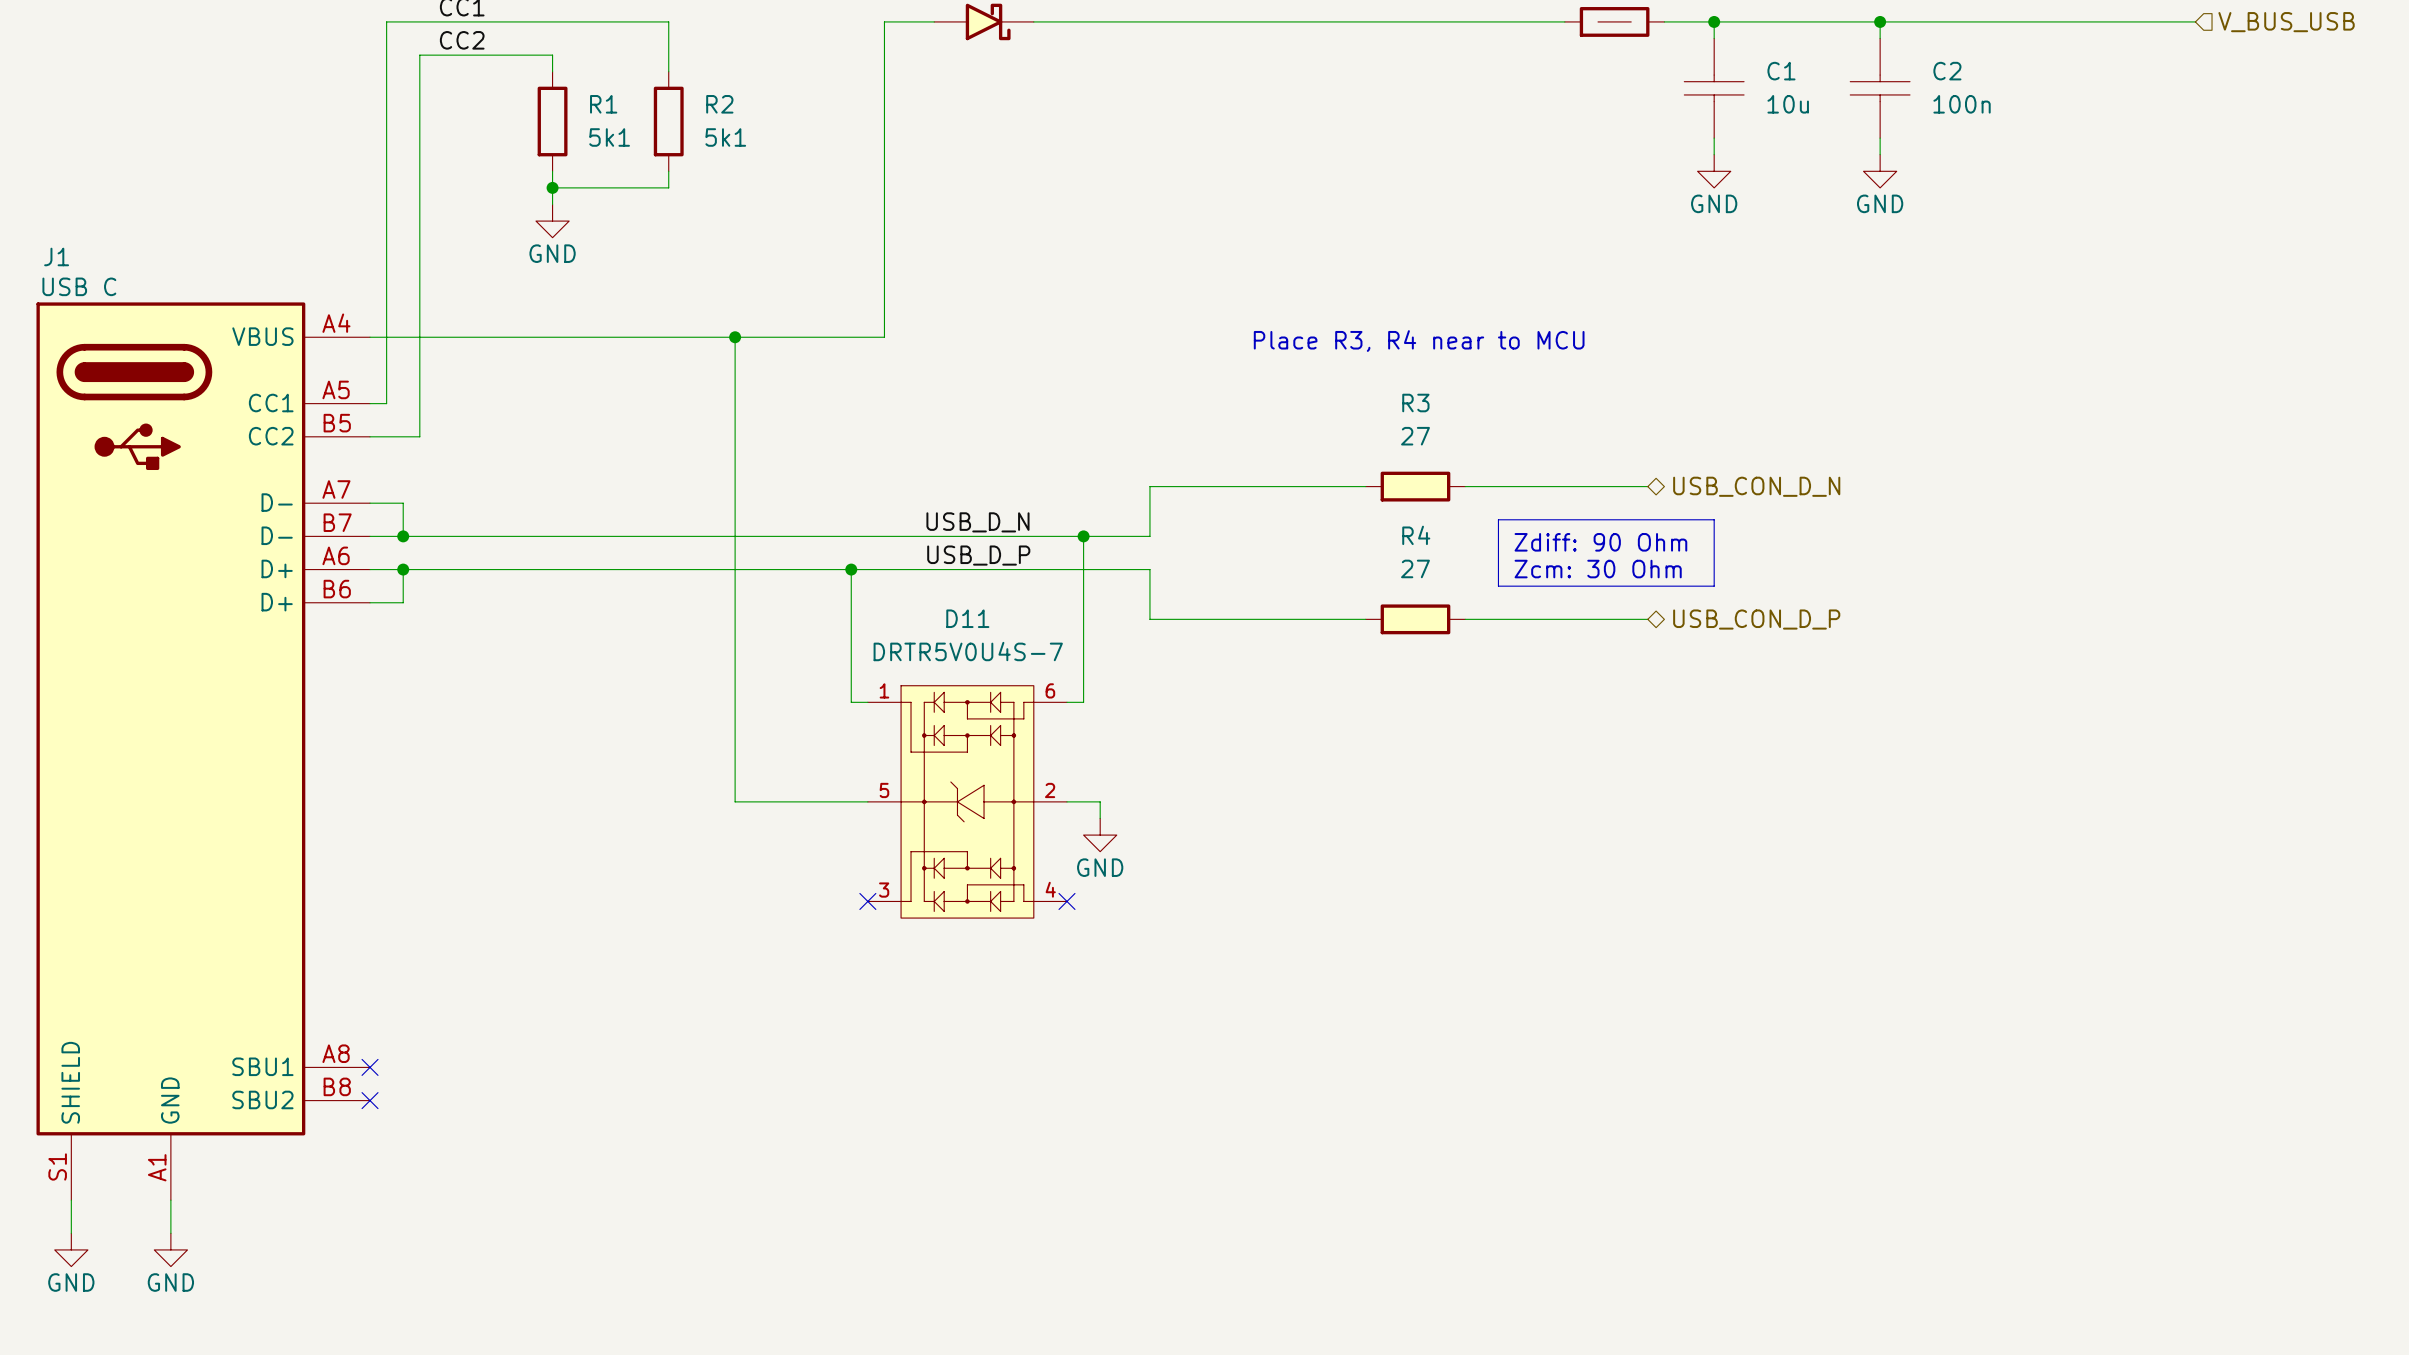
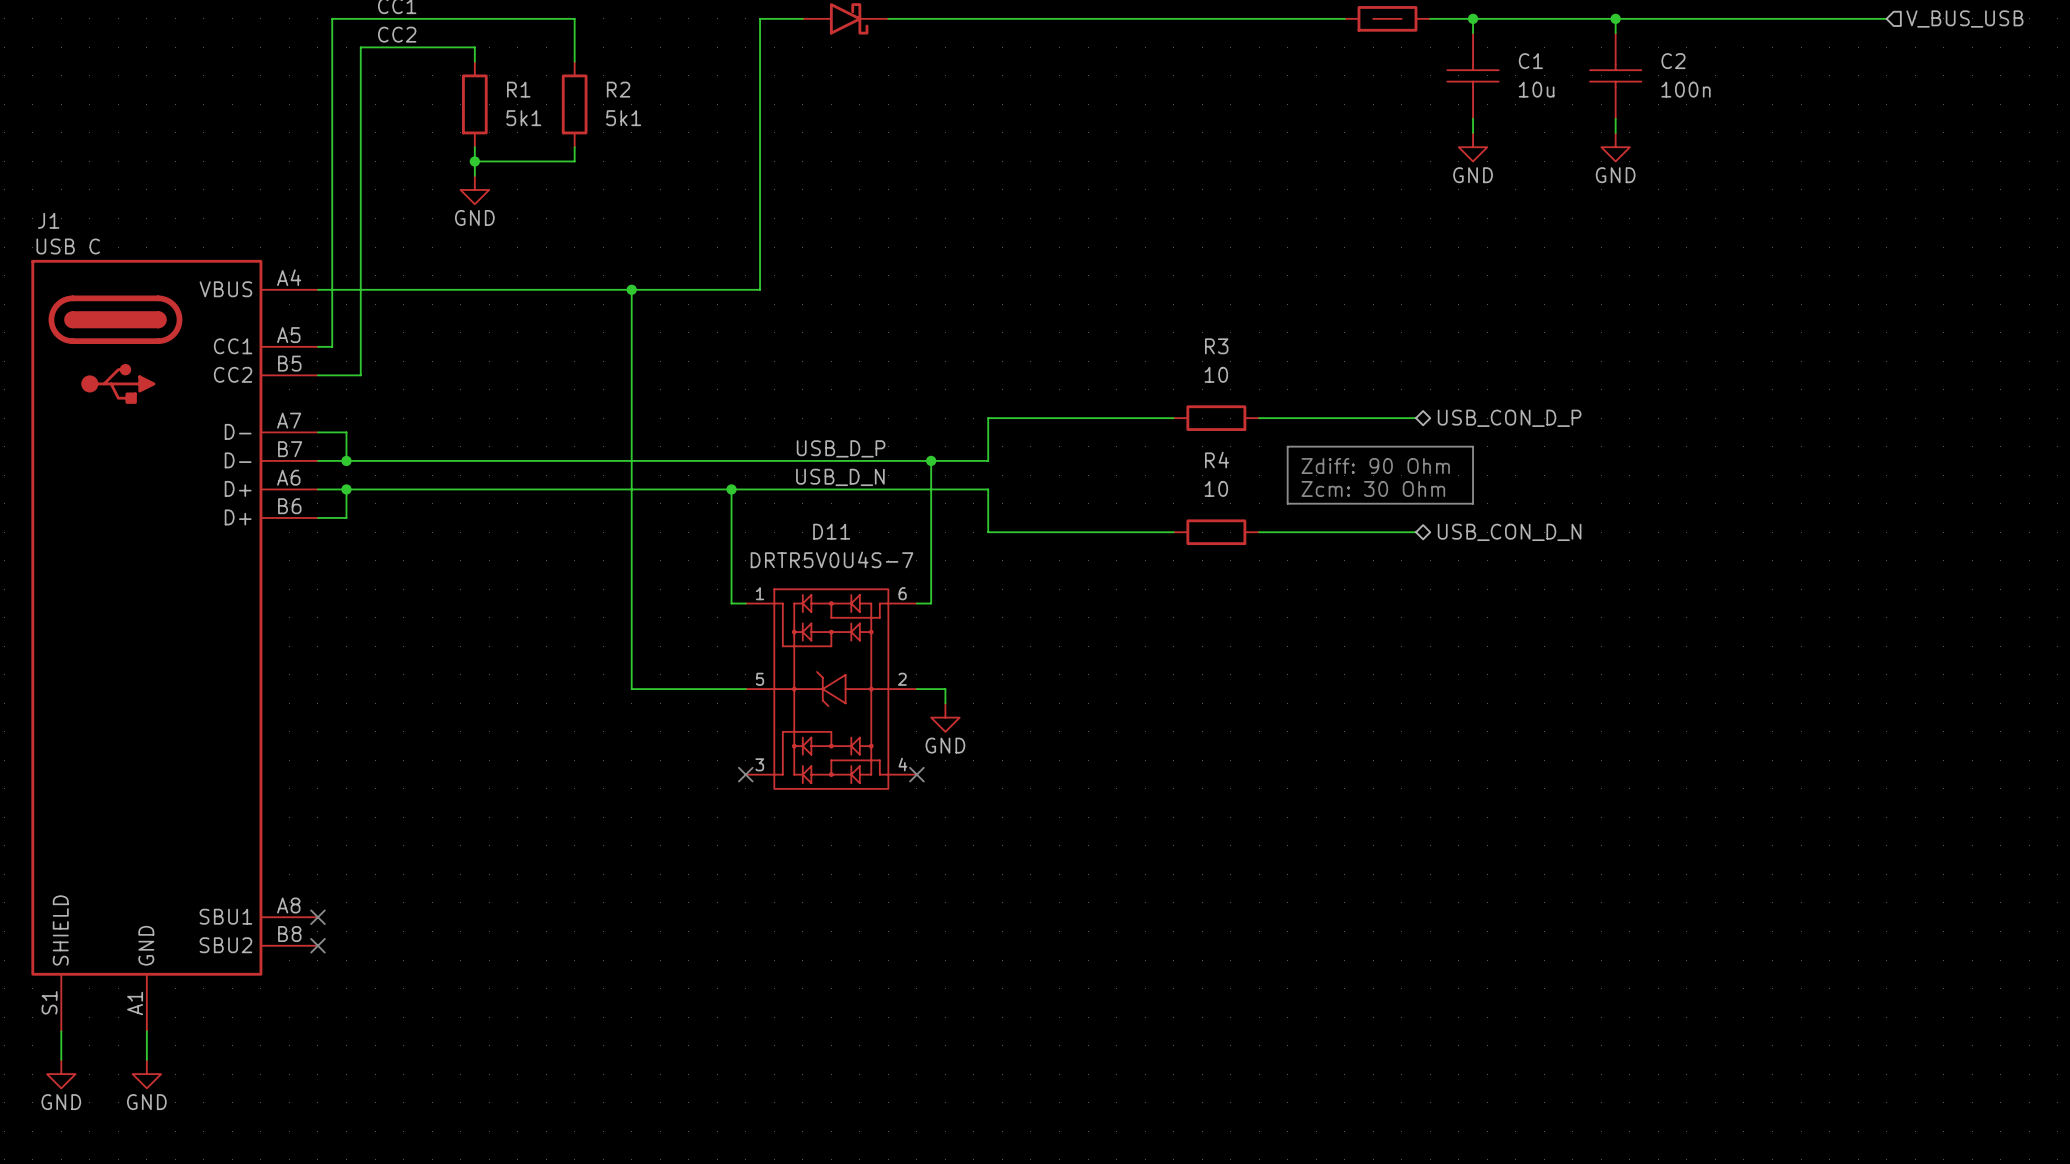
text: Place R3, R4 near to MCU (1419, 341) -> none
R3 text: none -> 10 (1216, 374)
R3 value: 27 (1415, 436) -> none
R3 symbol: [1365, 471, 1466, 502] -> [1173, 405, 1260, 431]
hierarchical label: USB_CON_D_N (1756, 486) -> USB_CON_D_P (1509, 418)
label: USB_D_N (977, 522) -> USB_D_P (841, 448)
label: USB_D_P (978, 555) -> USB_D_N (840, 477)
R4 text: none -> 10 (1216, 488)
R4 value: 27 (1415, 568) -> none
R4 symbol: [1365, 604, 1466, 635] -> [1173, 519, 1260, 546]
hierarchical label: USB_CON_D_P (1756, 619) -> USB_CON_D_N (1509, 532)

